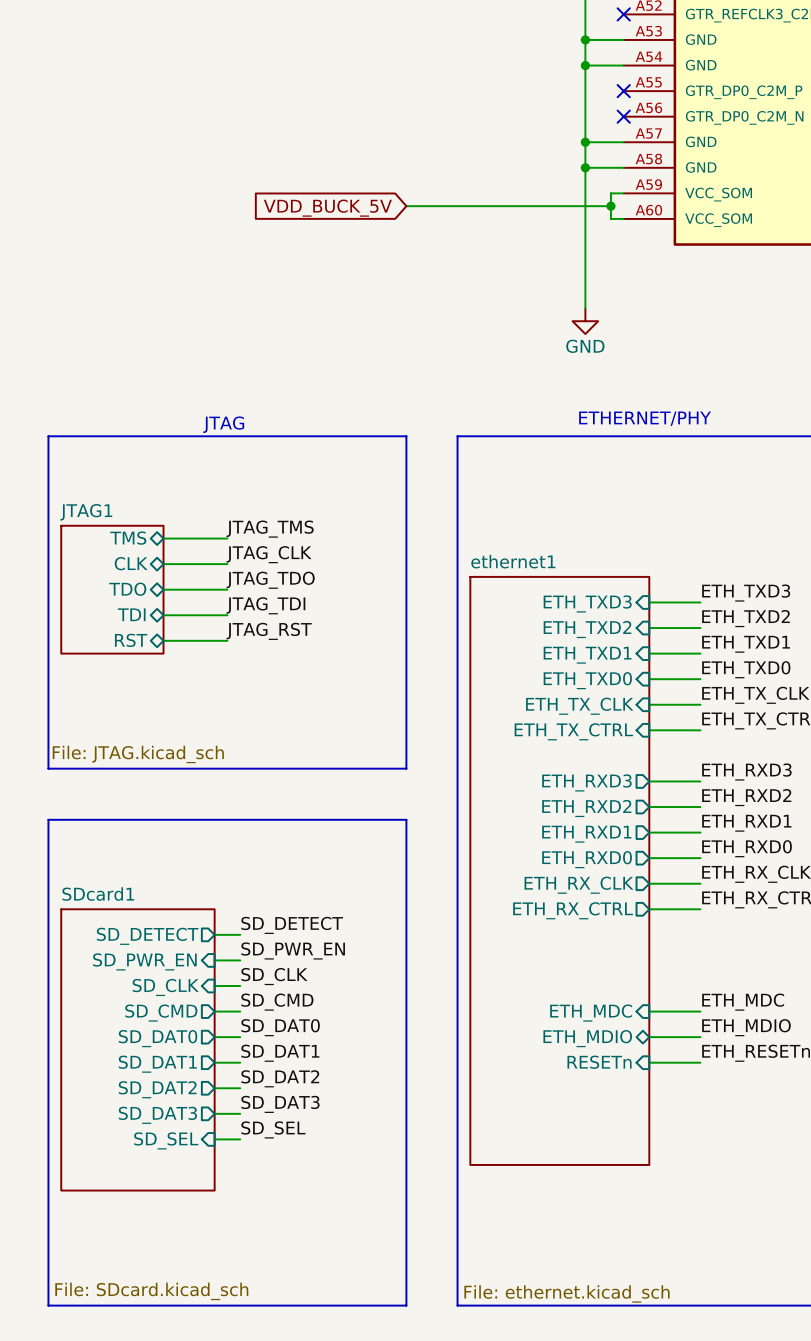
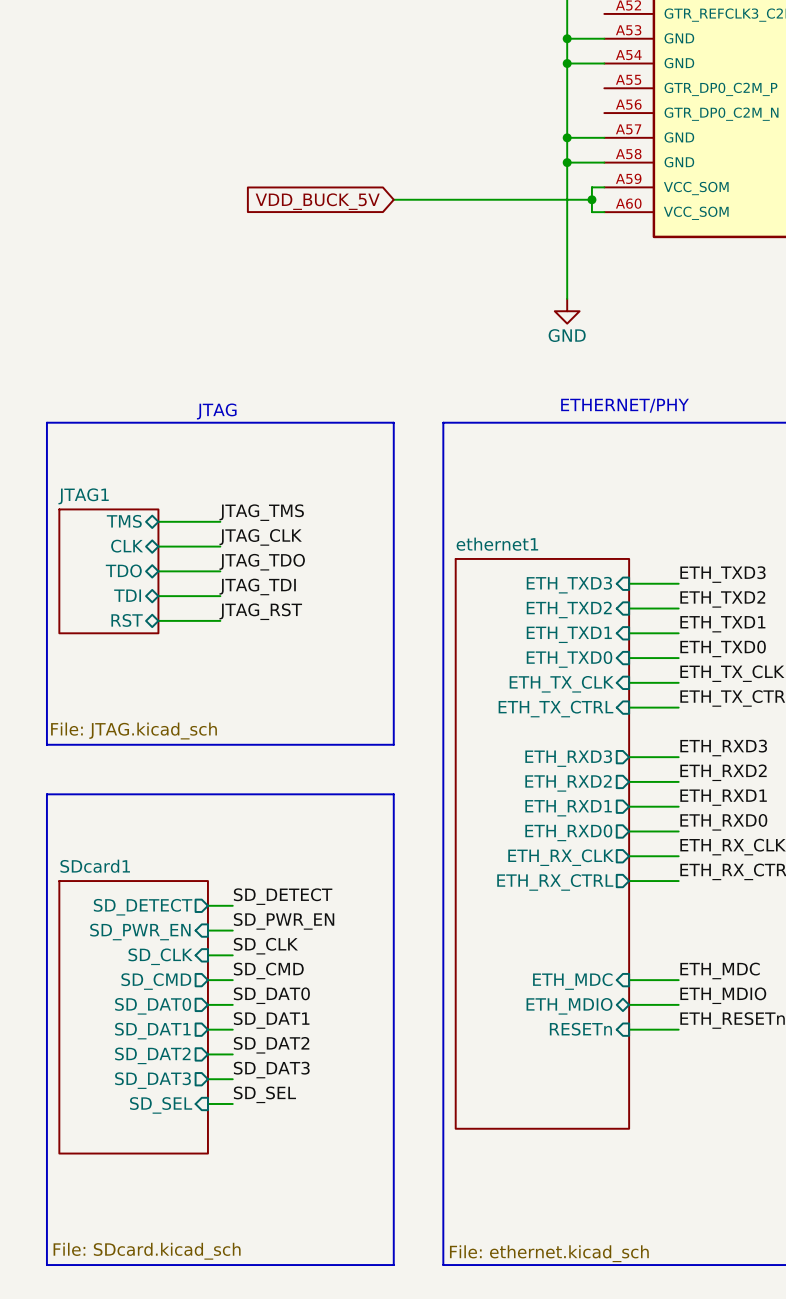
no-connect mark: (623, 14) -> none
no-connect mark: (623, 91) -> none
no-connect mark: (623, 116) -> none

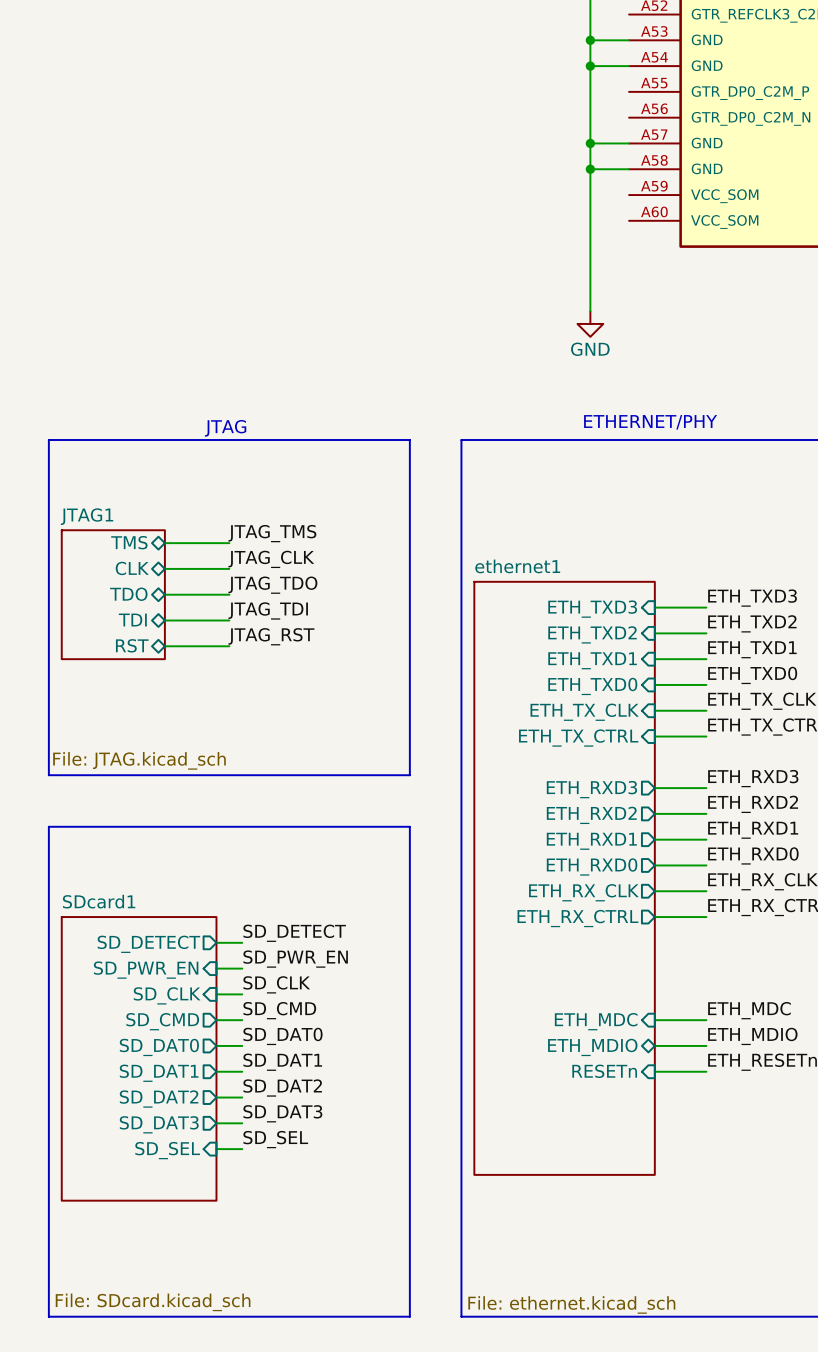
wire: (604, 187) (591, 187) (591, 212) (604, 212) -> none
wire: (393, 199) (591, 199) -> none
junction: (591, 199) -> none
global label: VDD_BUCK_5V (317, 201) -> none

